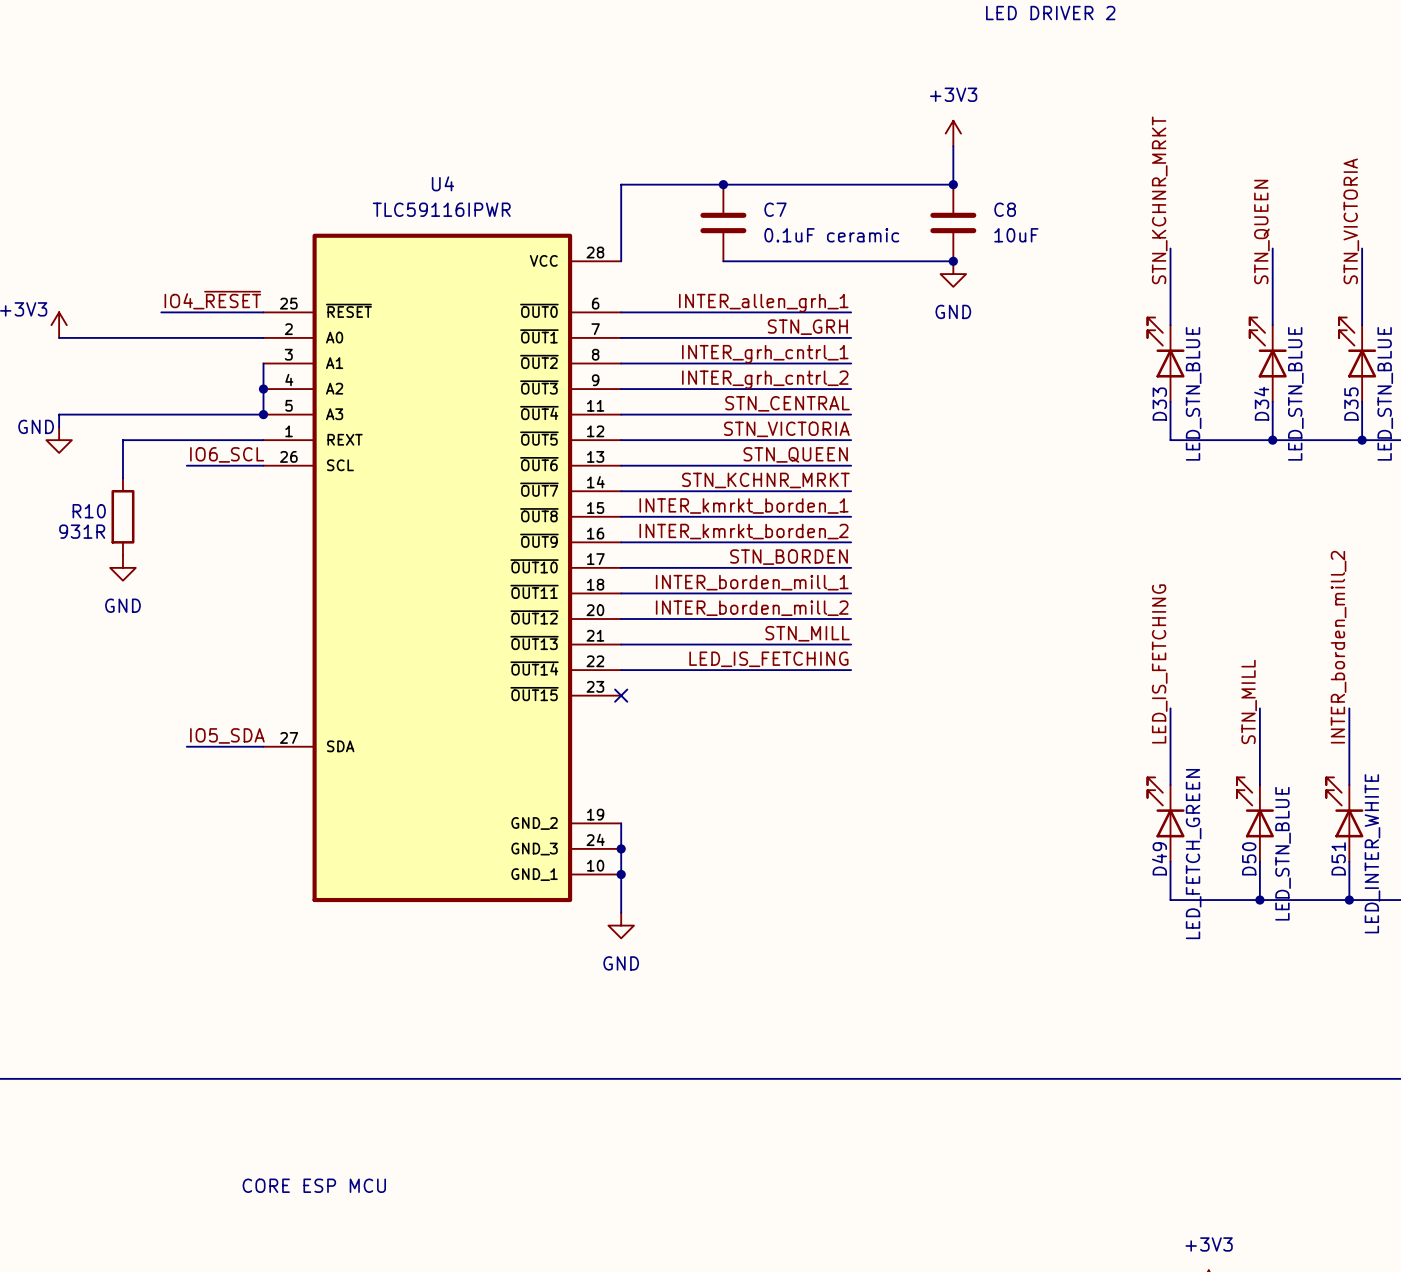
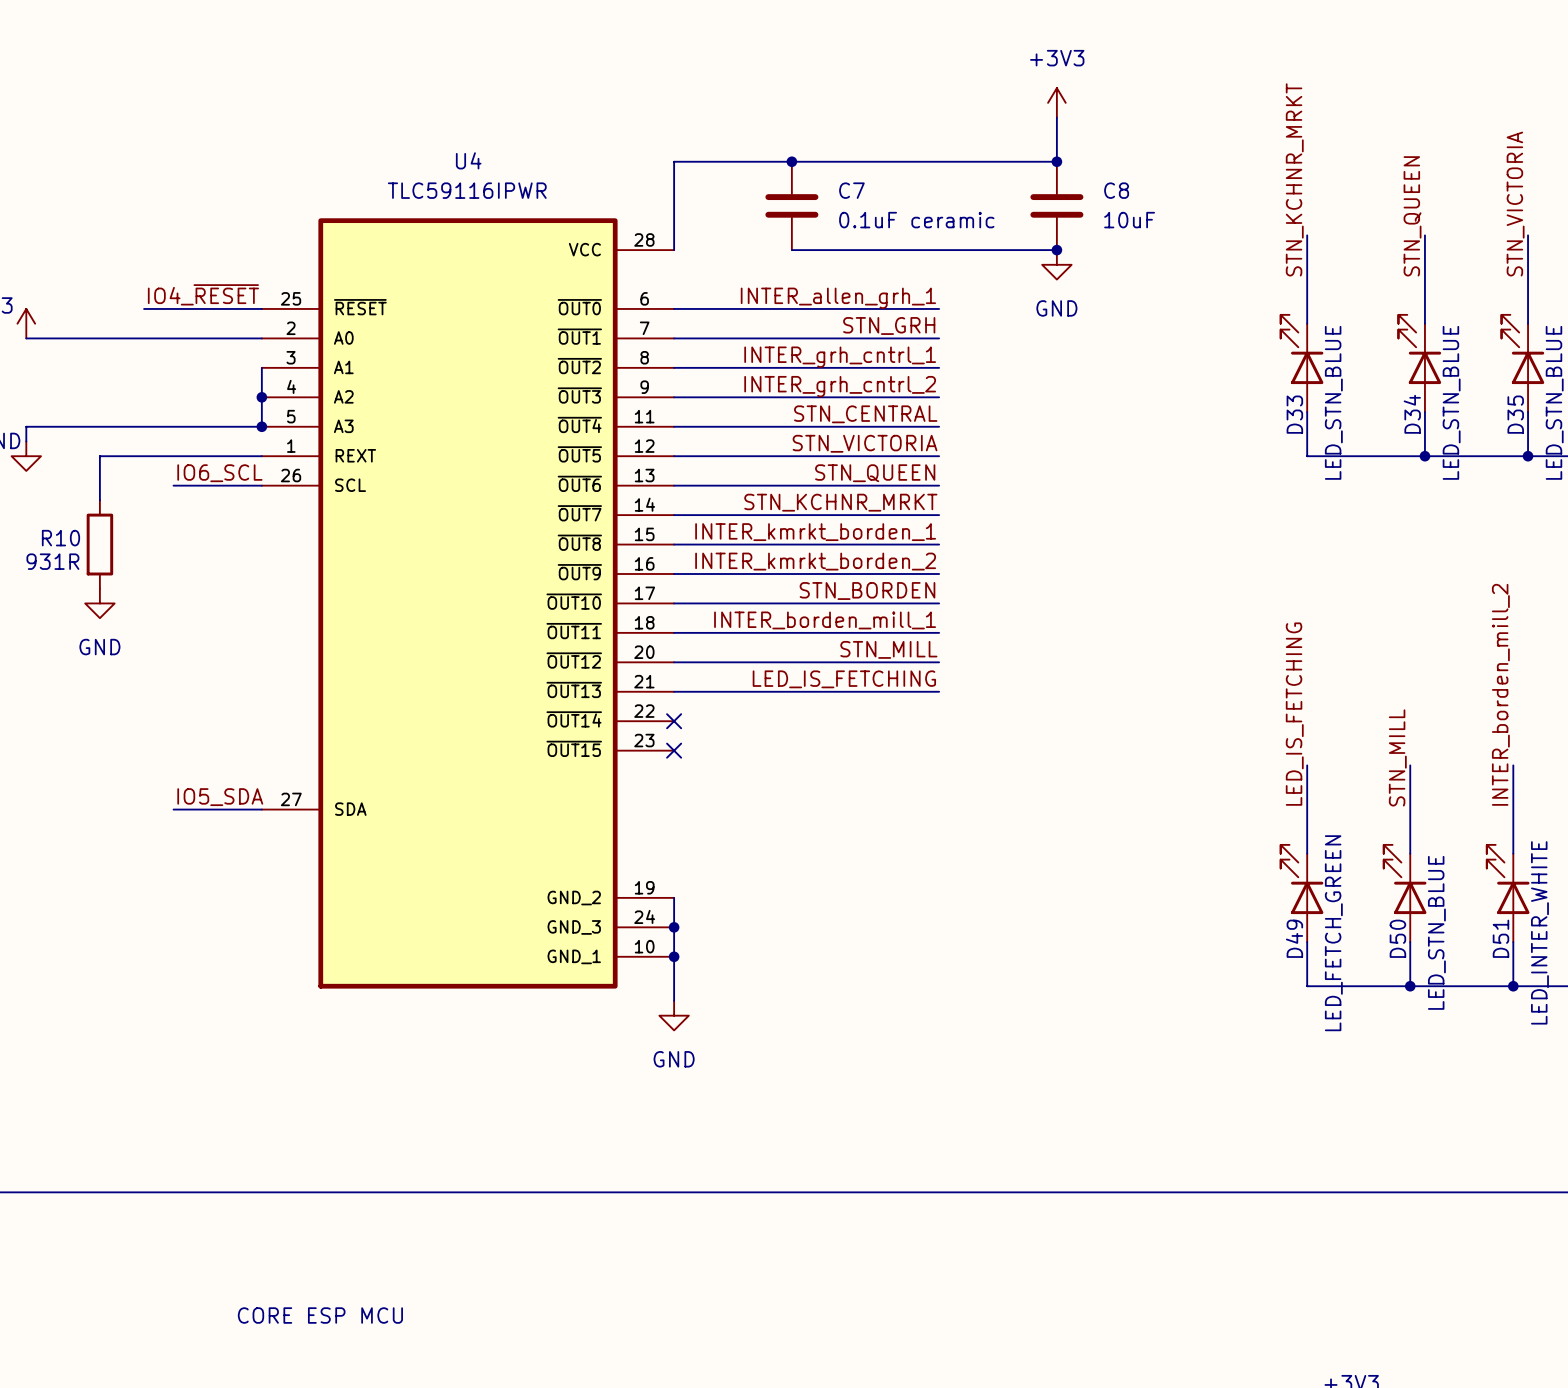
label: INTER_borden_mill_2 (752, 608) -> STN_MILL (888, 649)
label: STN_MILL (807, 633) -> LED_IS_FETCHING (844, 679)
label: LED_IS_FETCHING (768, 659) -> none
wire: (621, 670) (851, 670) -> none
no-connect mark: none -> (674, 721)

